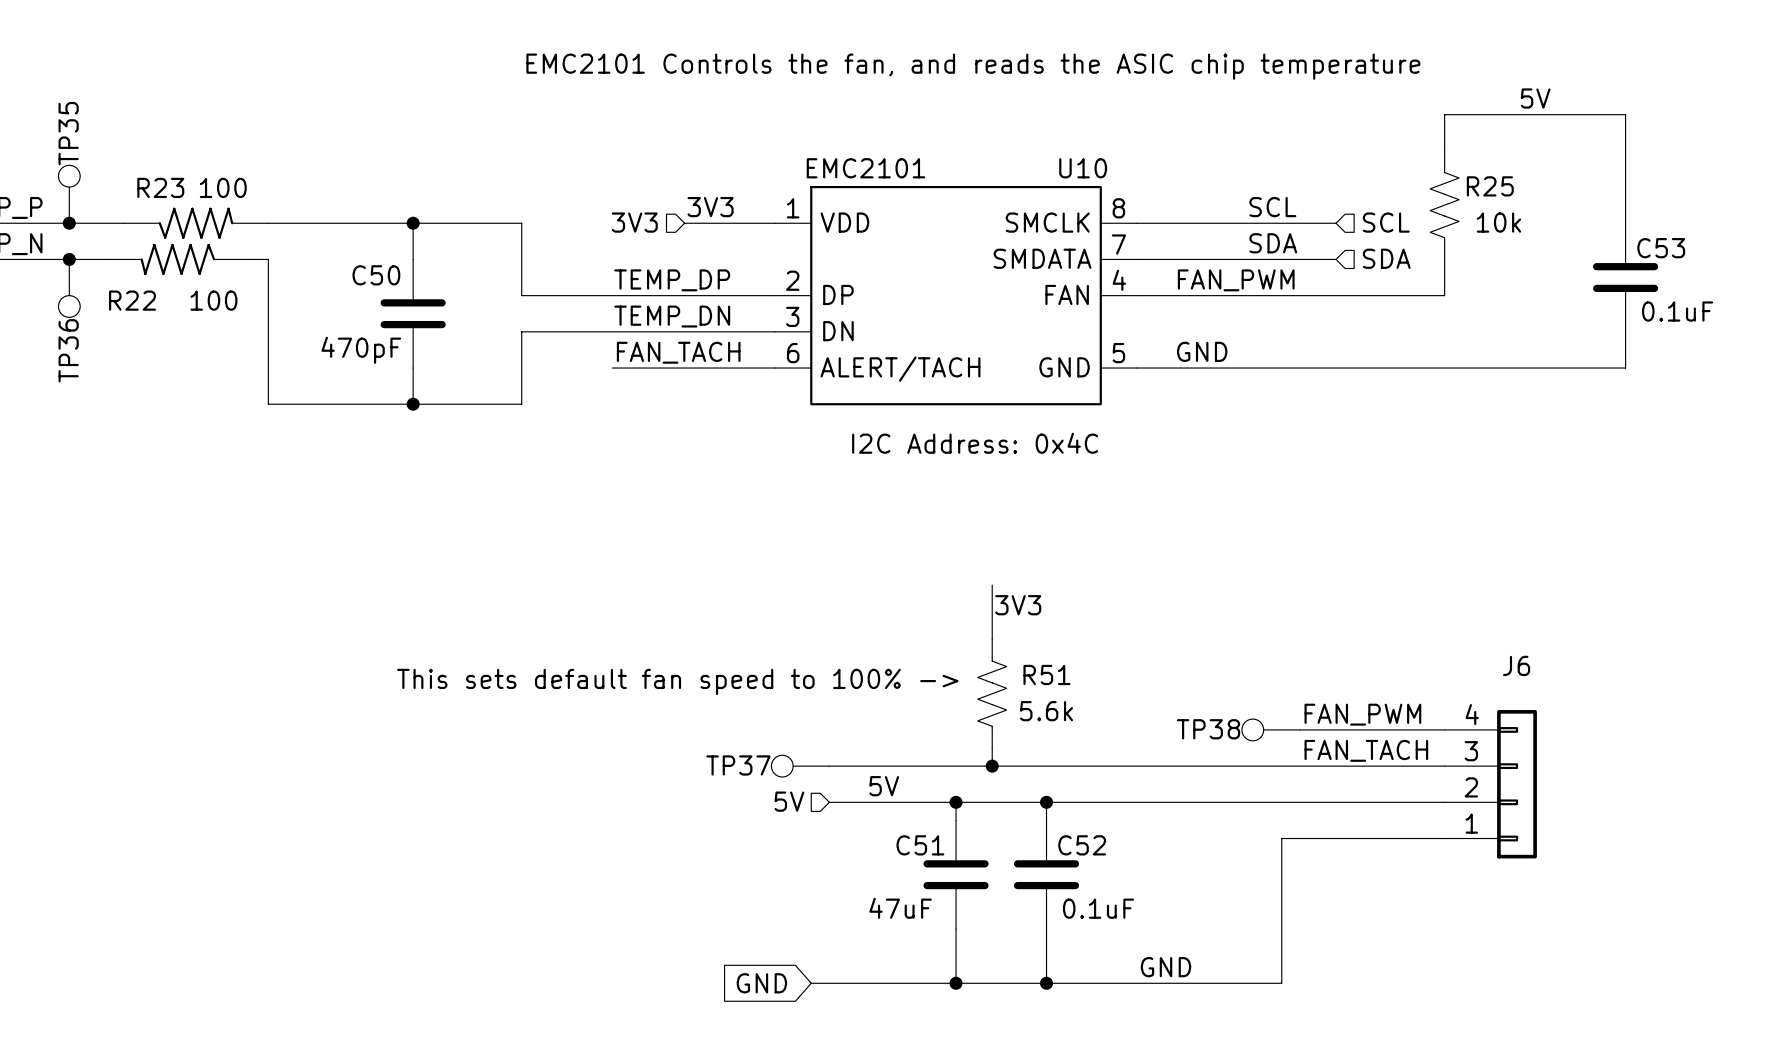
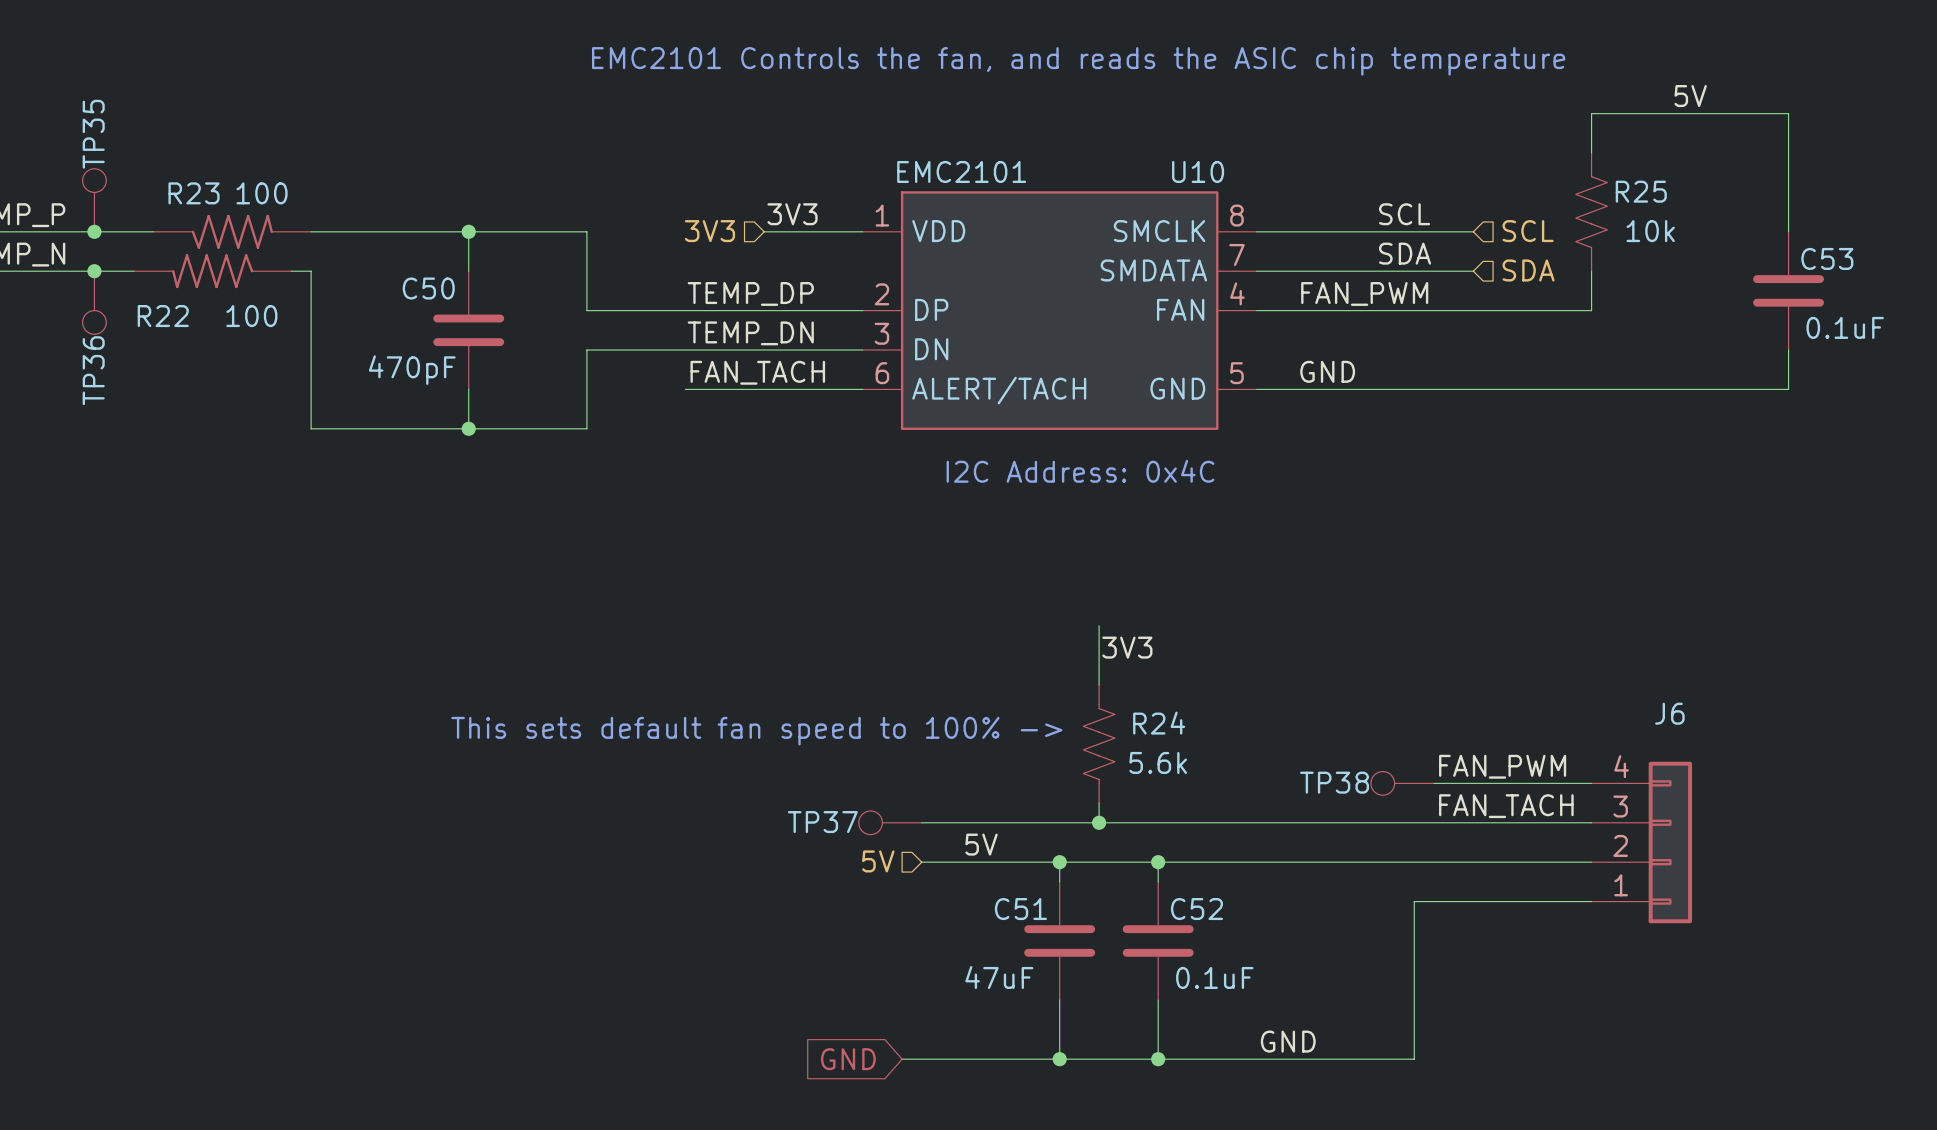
R51 name: R51 (1046, 674) -> R24 (1159, 723)

